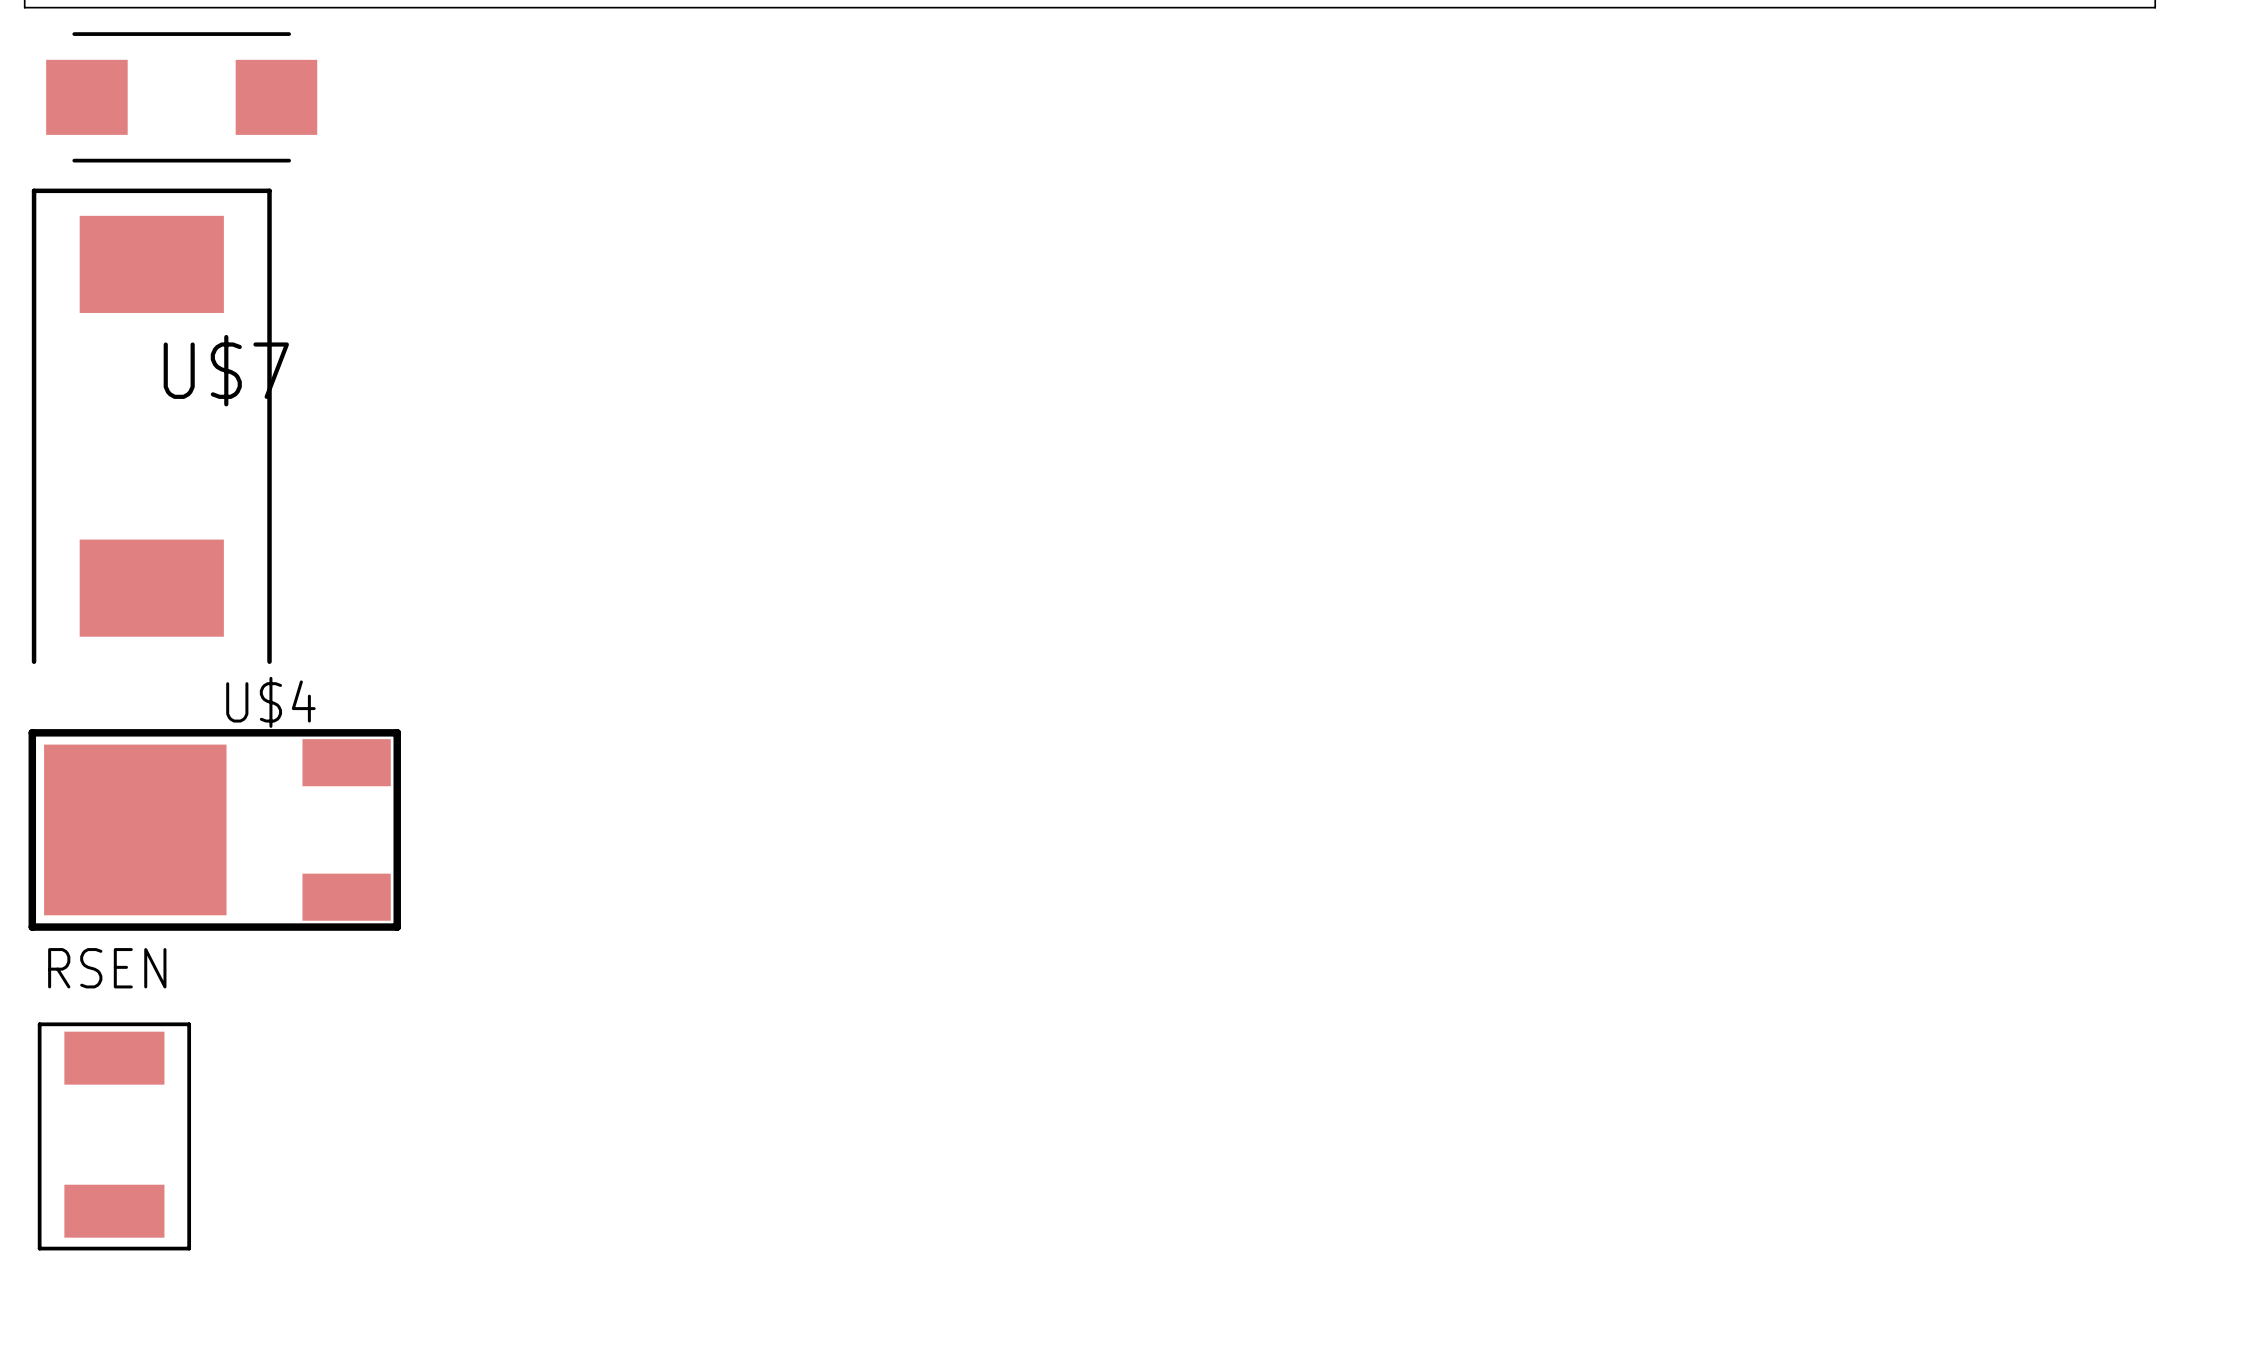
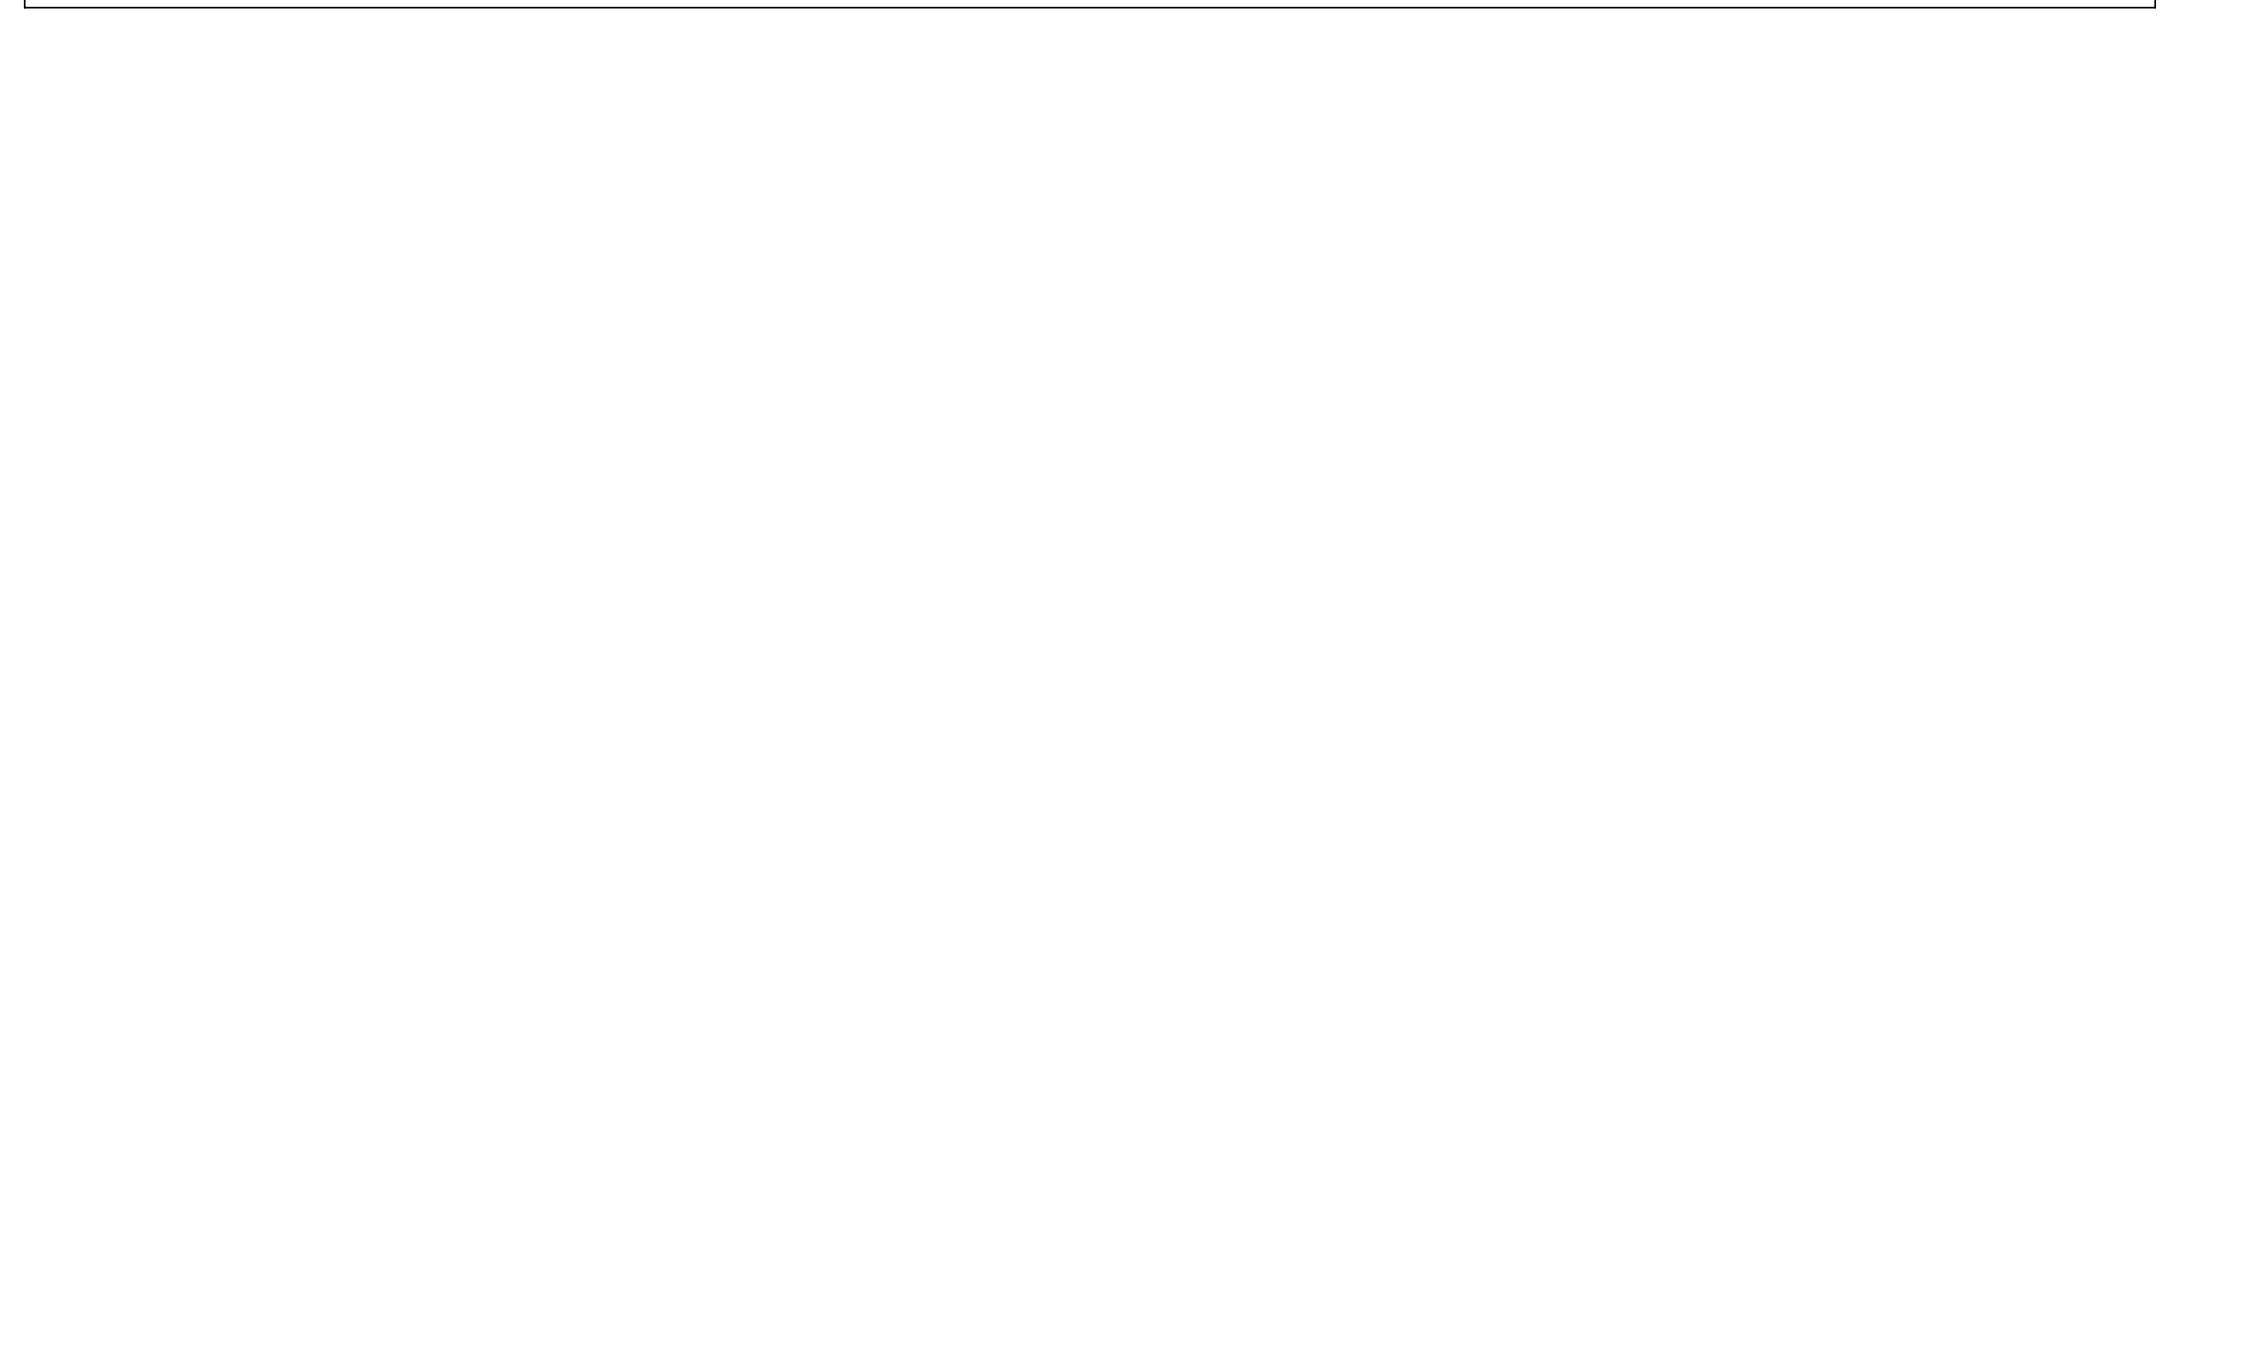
part: (181, 97) -> none
U$7: (151, 426) -> none
U$4: (214, 829) -> none
RSEN: (114, 1136) -> none

